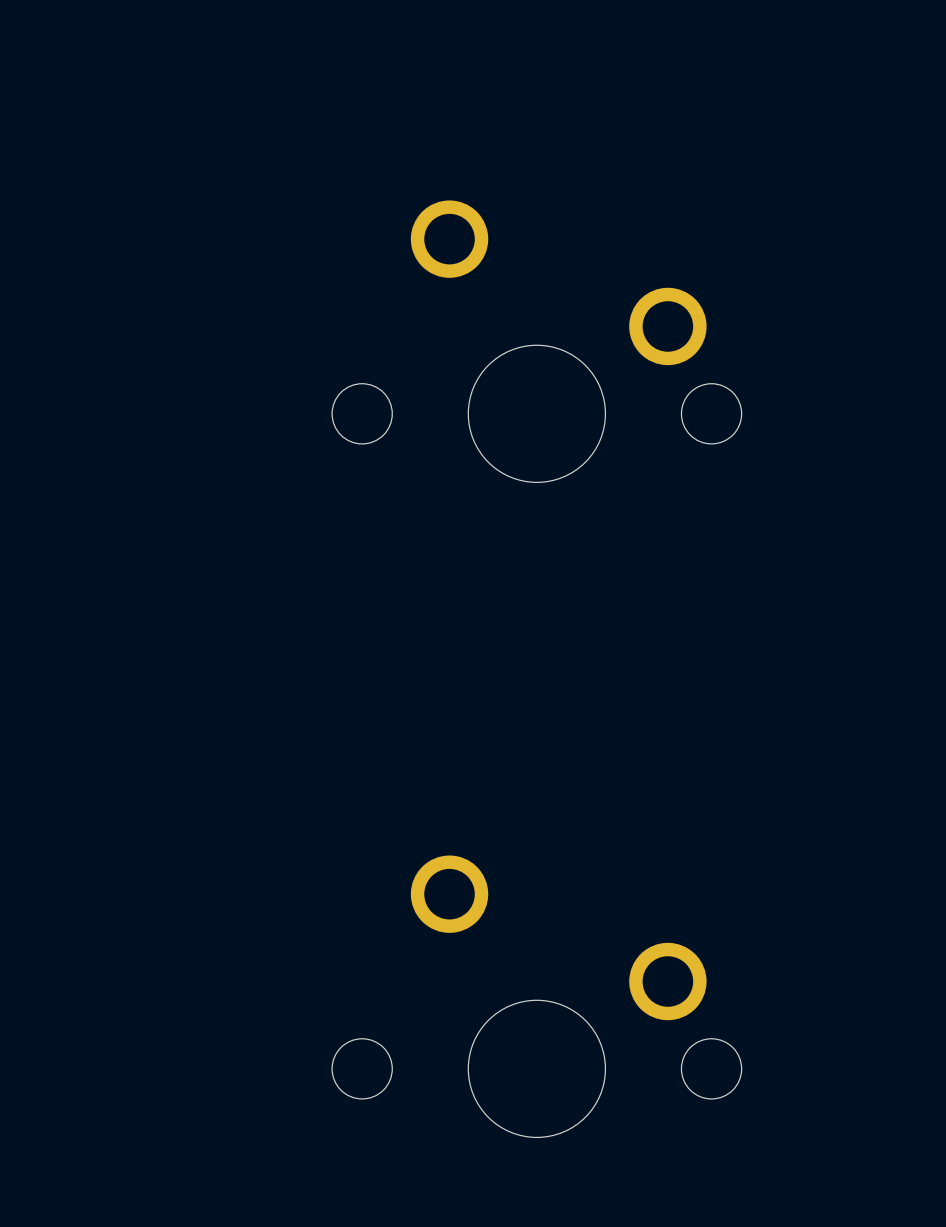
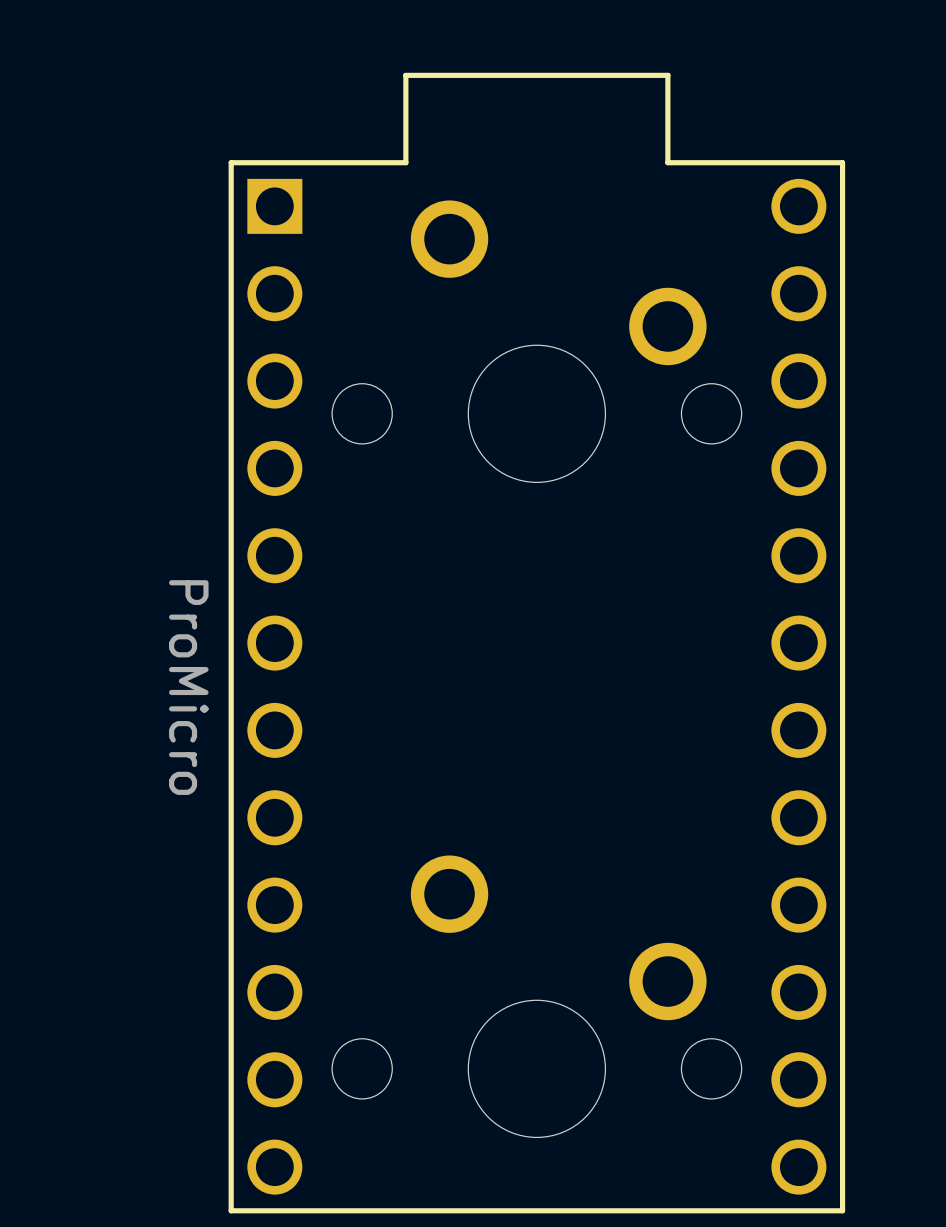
part: none -> ProMicro (536, 643)

